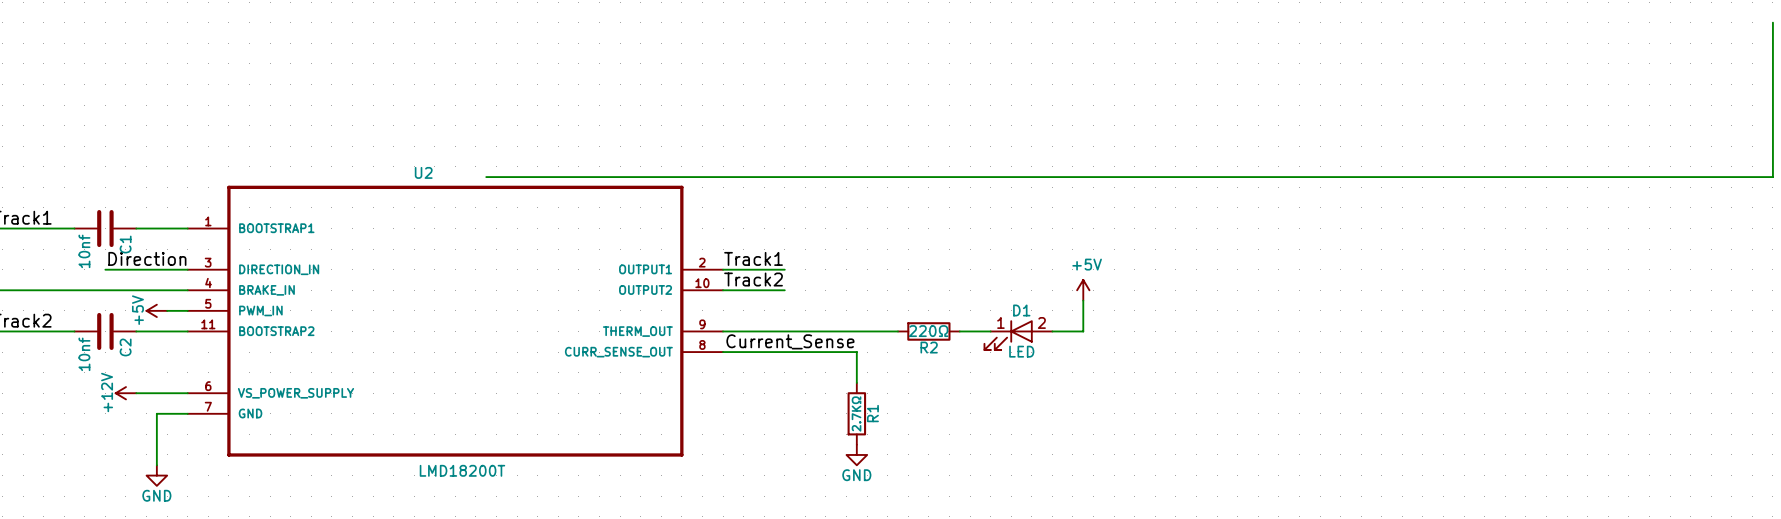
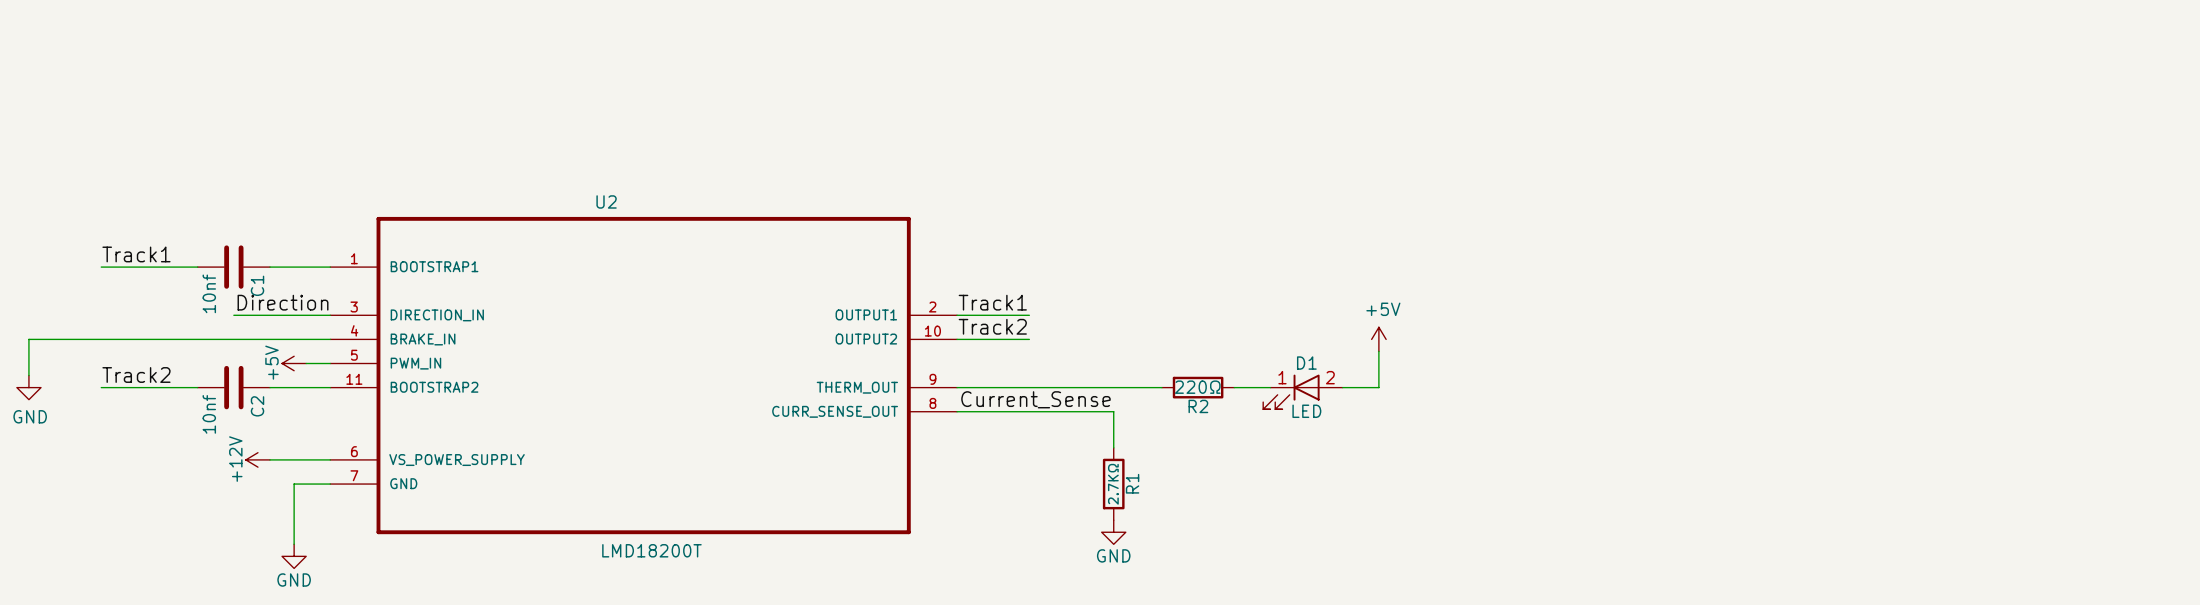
wire: (1772, 22) (1772, 177) (486, 177) -> none

